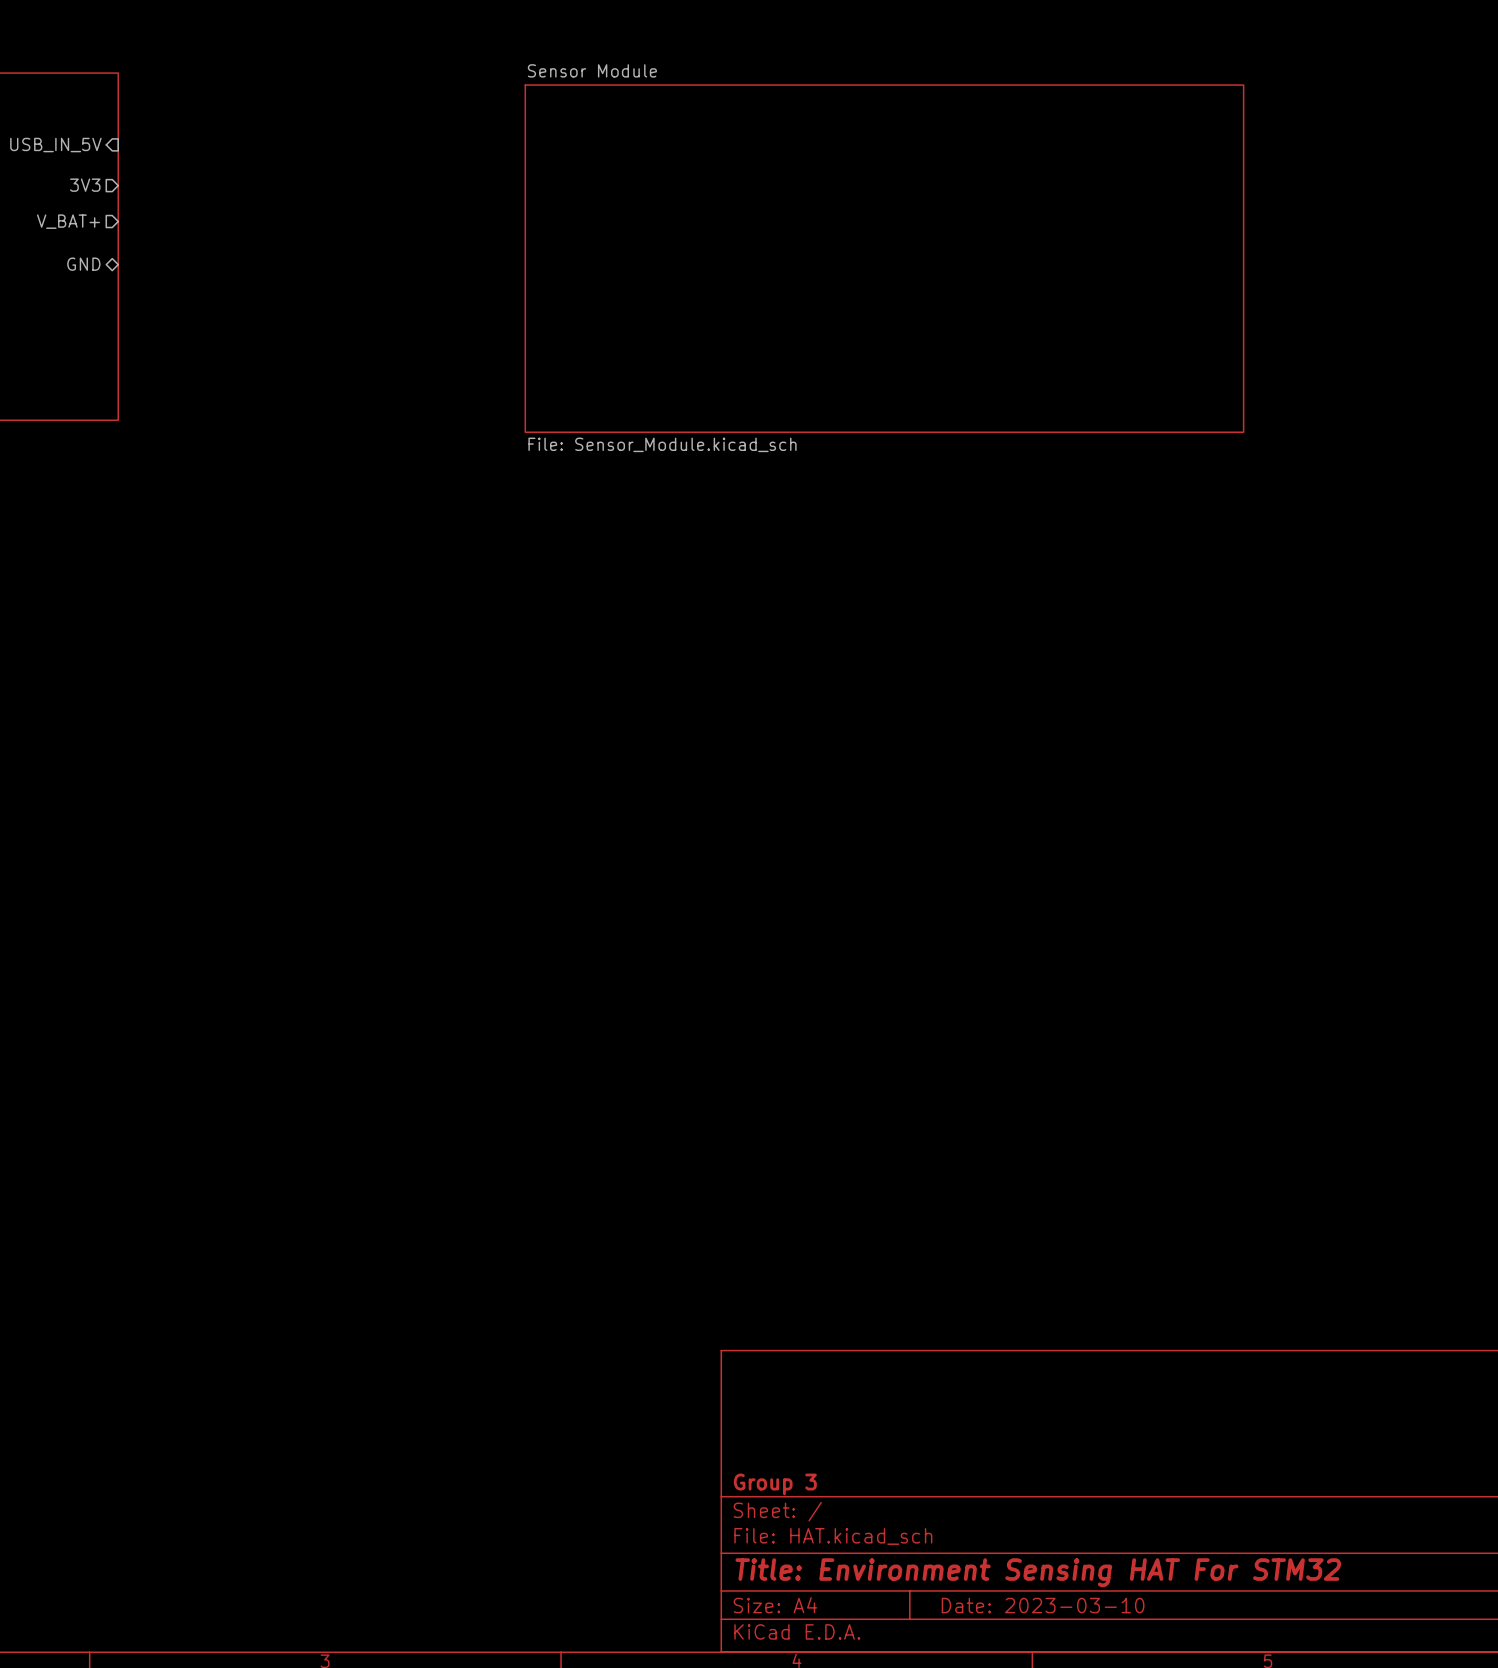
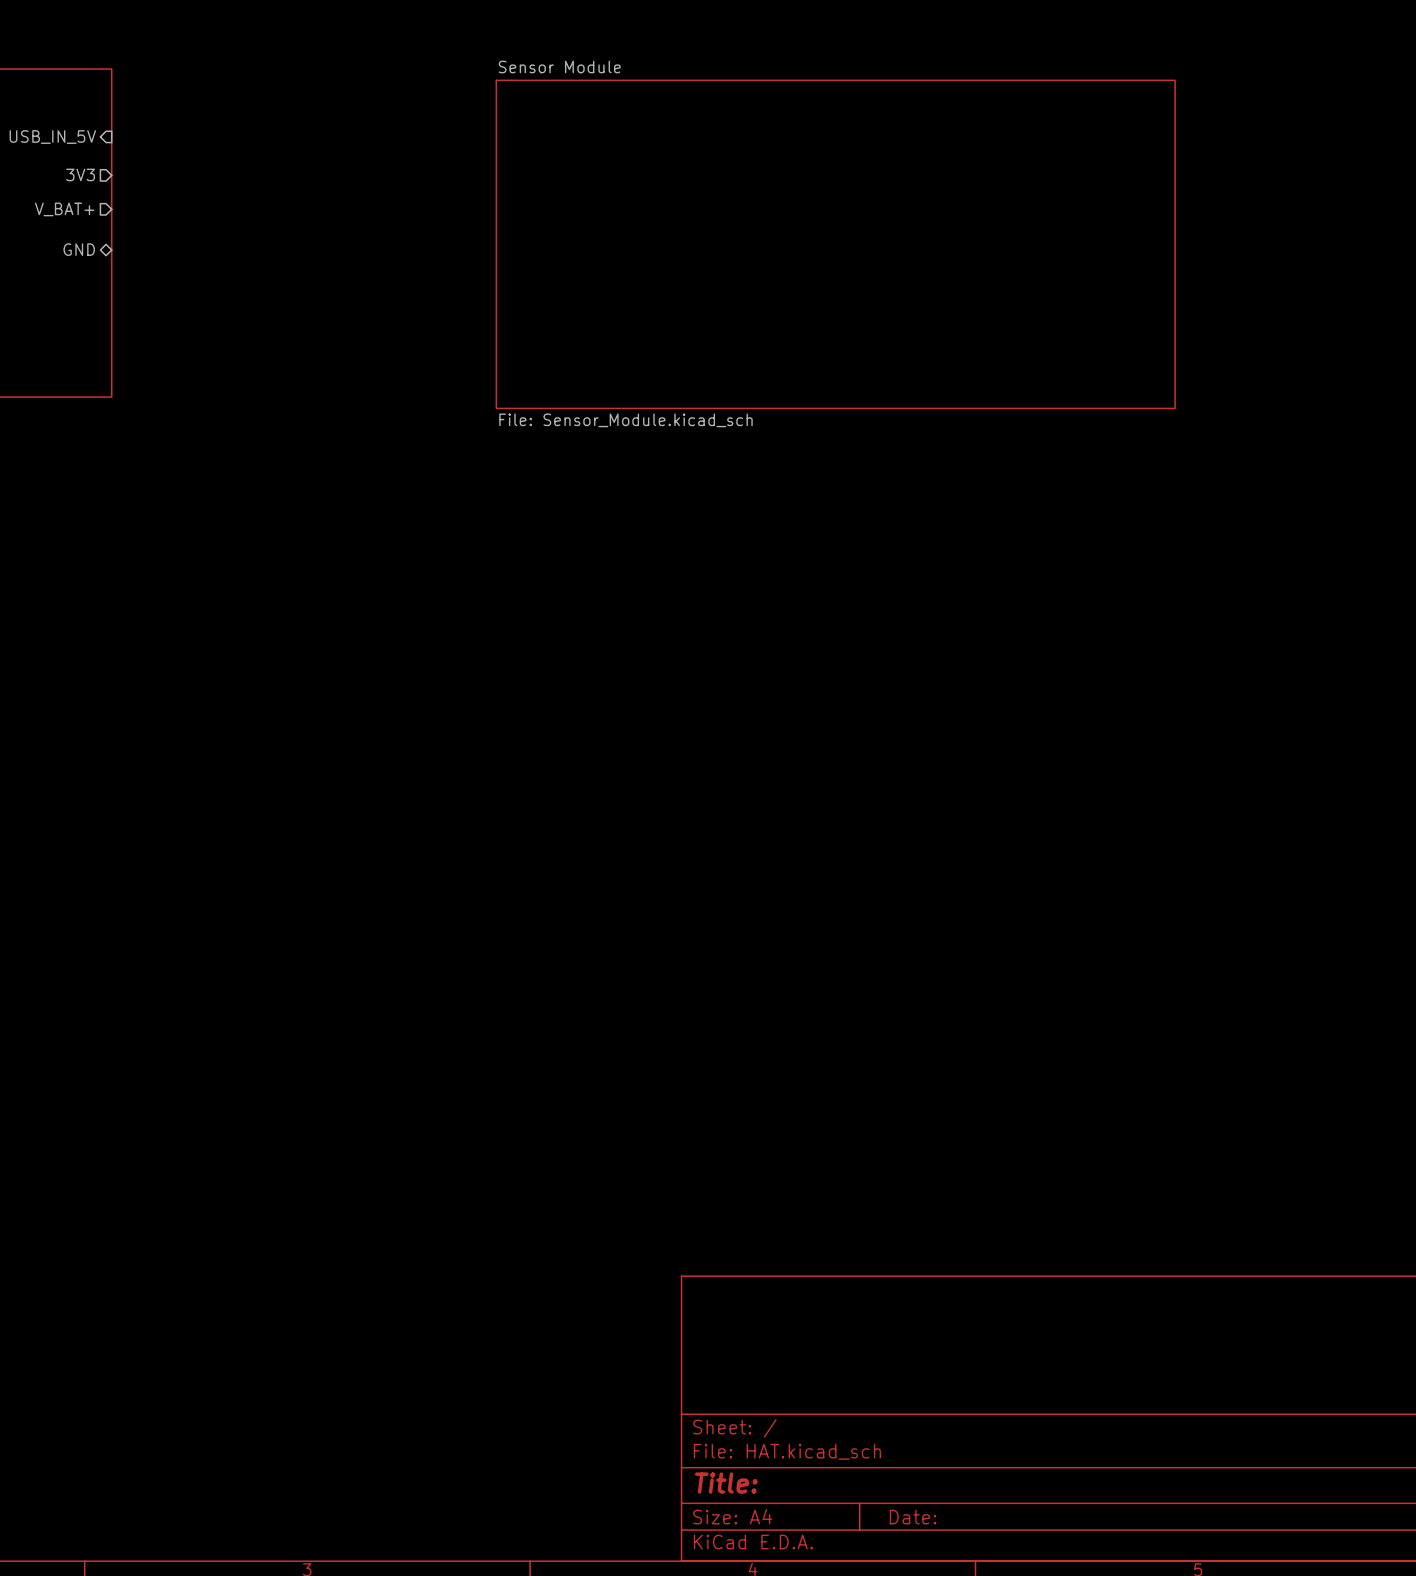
title block: Group 3 (775, 1484) -> none
title block: Title: Environment Sensing HAT For STM32 (1038, 1572) -> Title: (726, 1483)
title block: Date: 2023-03-10 (1043, 1605) -> Date: (913, 1517)

